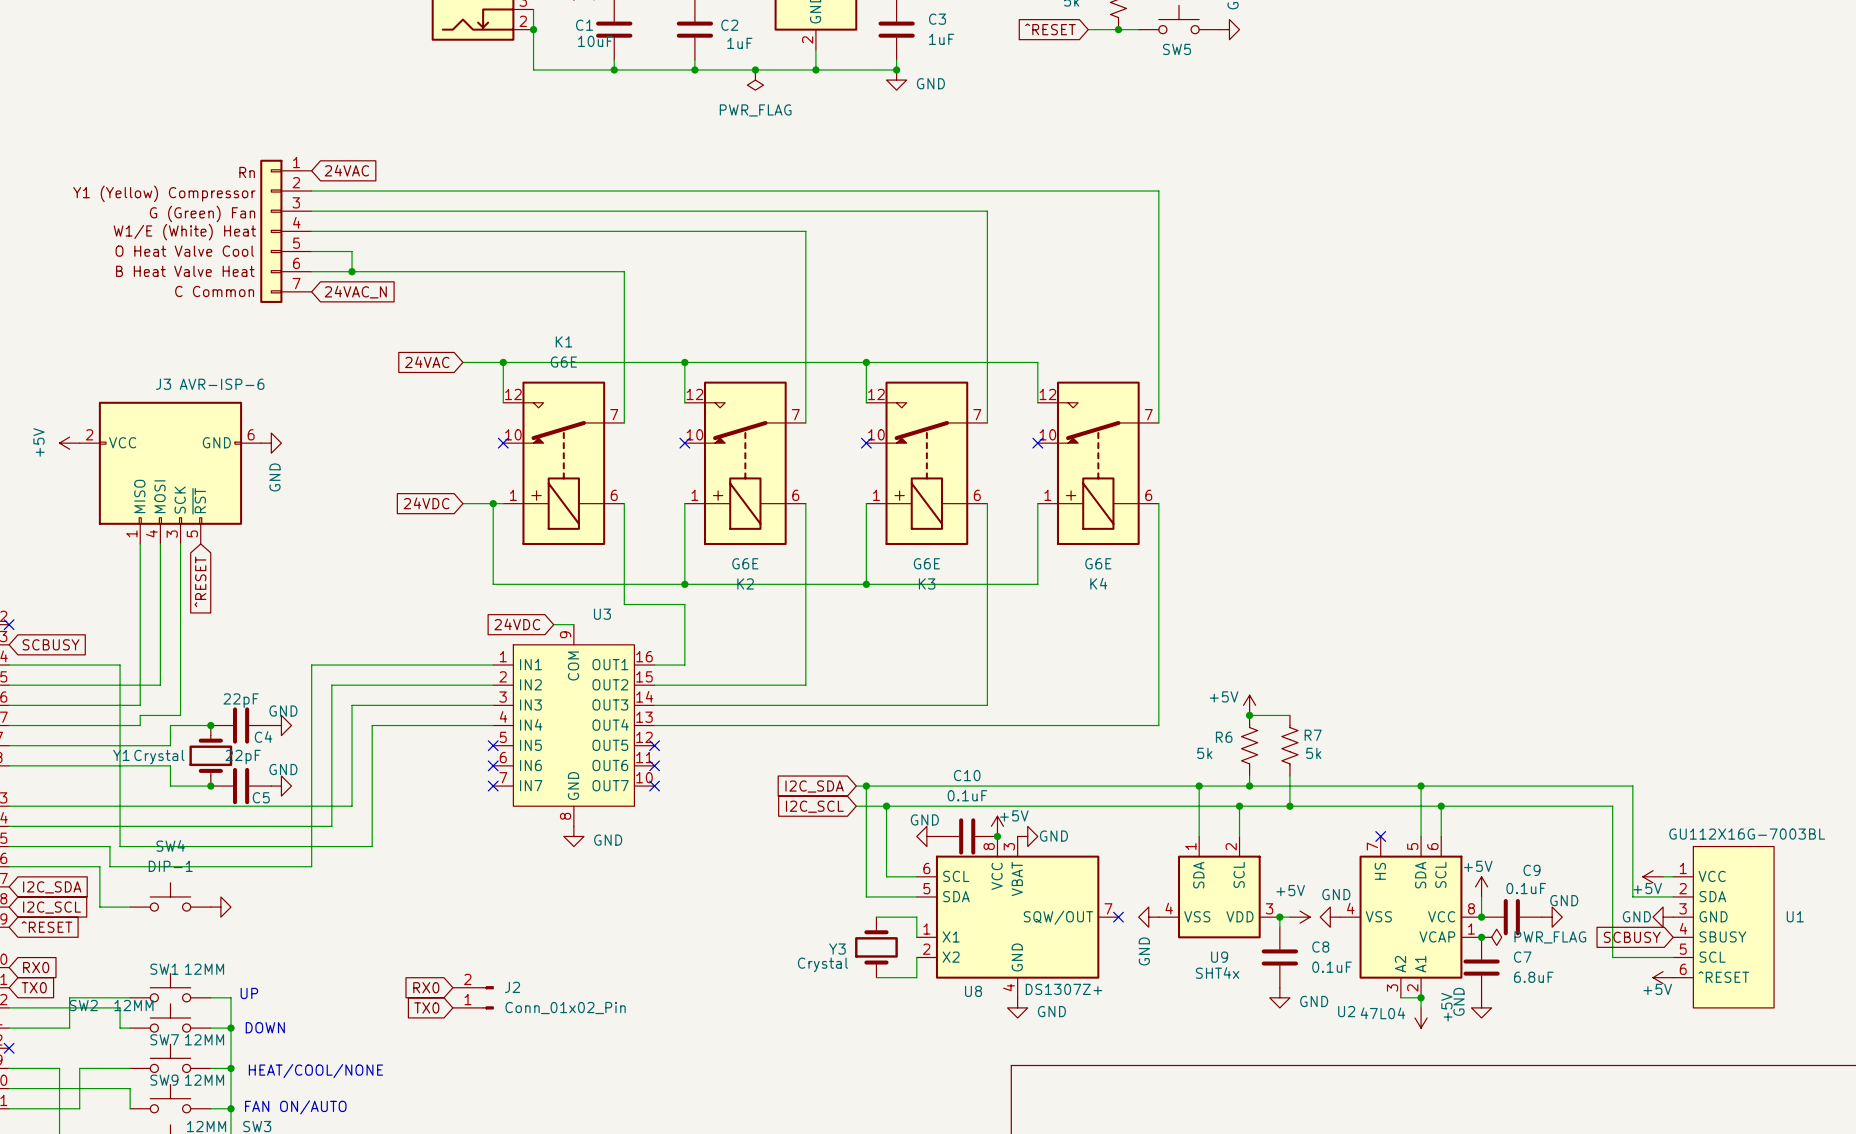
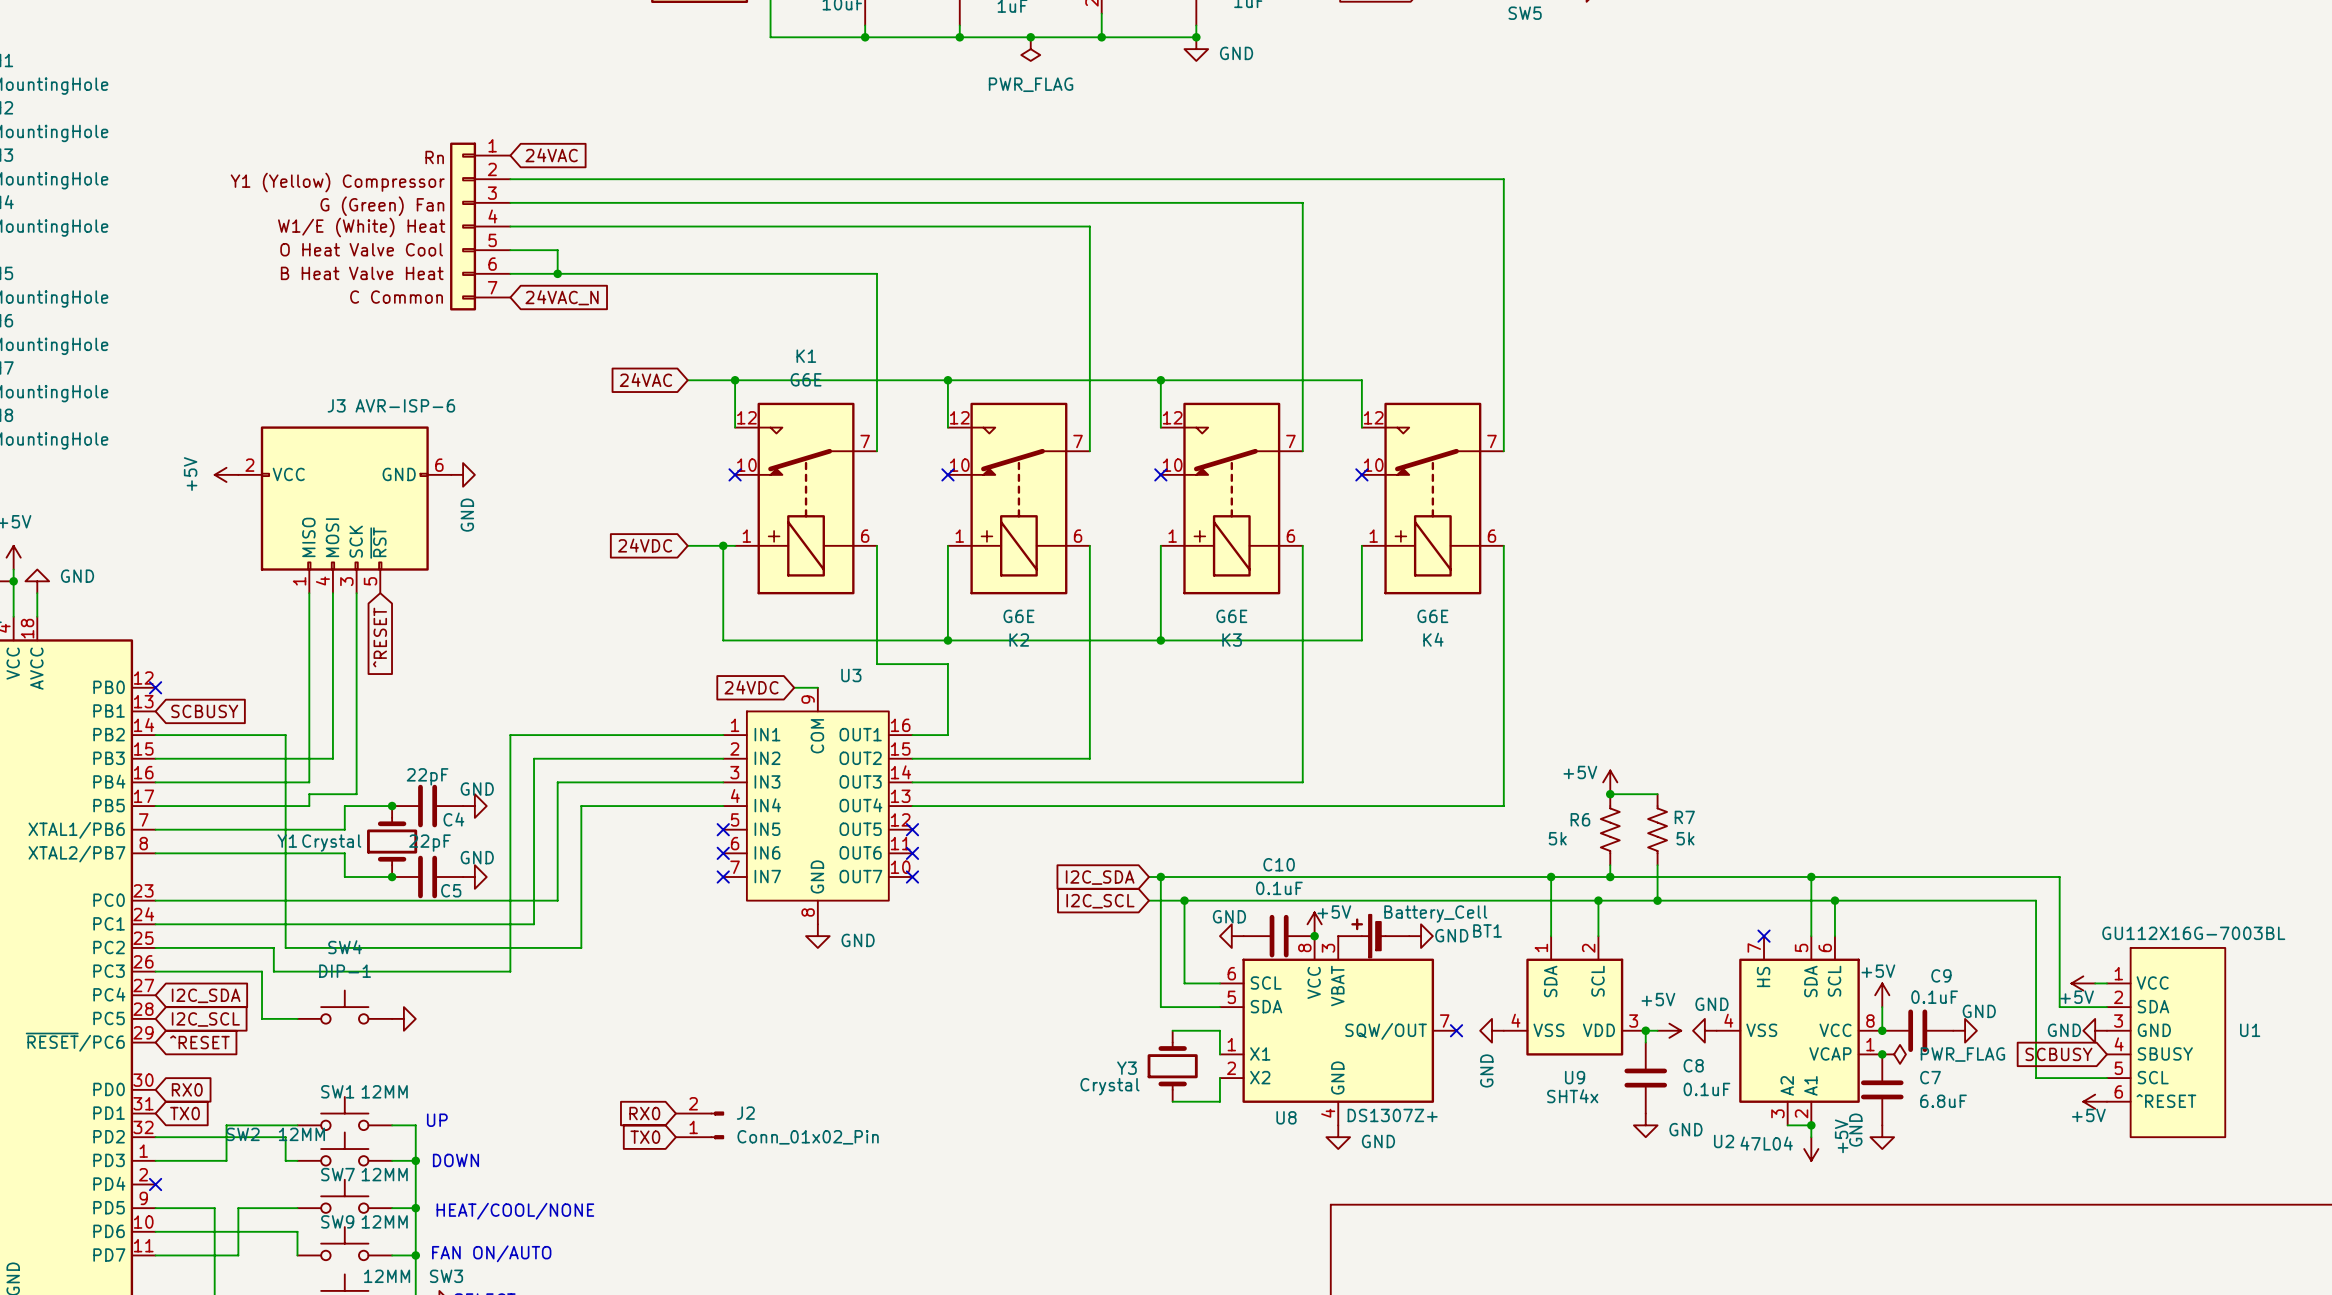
power symbol position: GND (1027, 836) -> GND (1421, 936)
BT1: none -> Battery_Cell (1373, 936)

